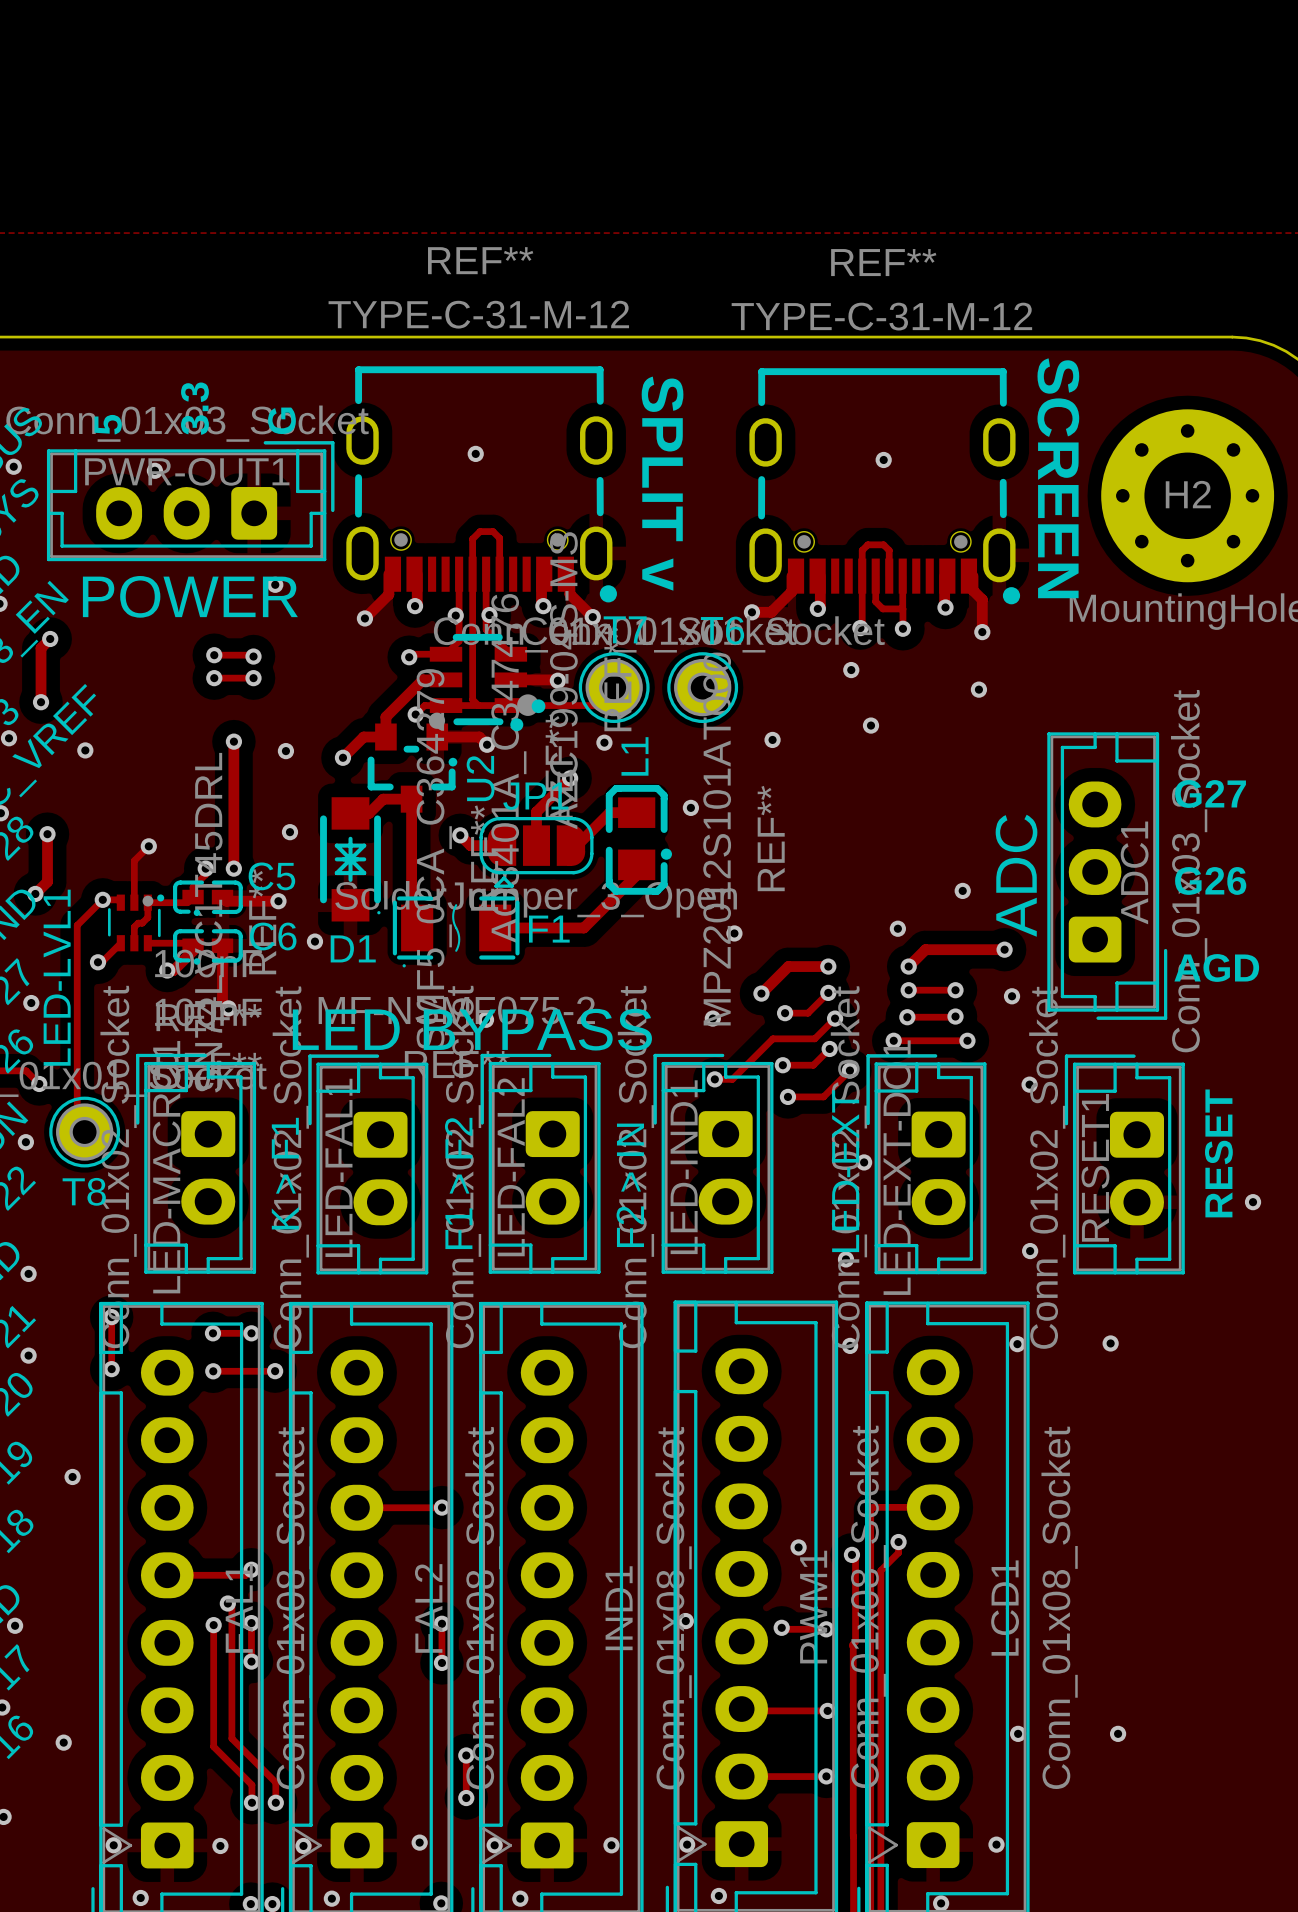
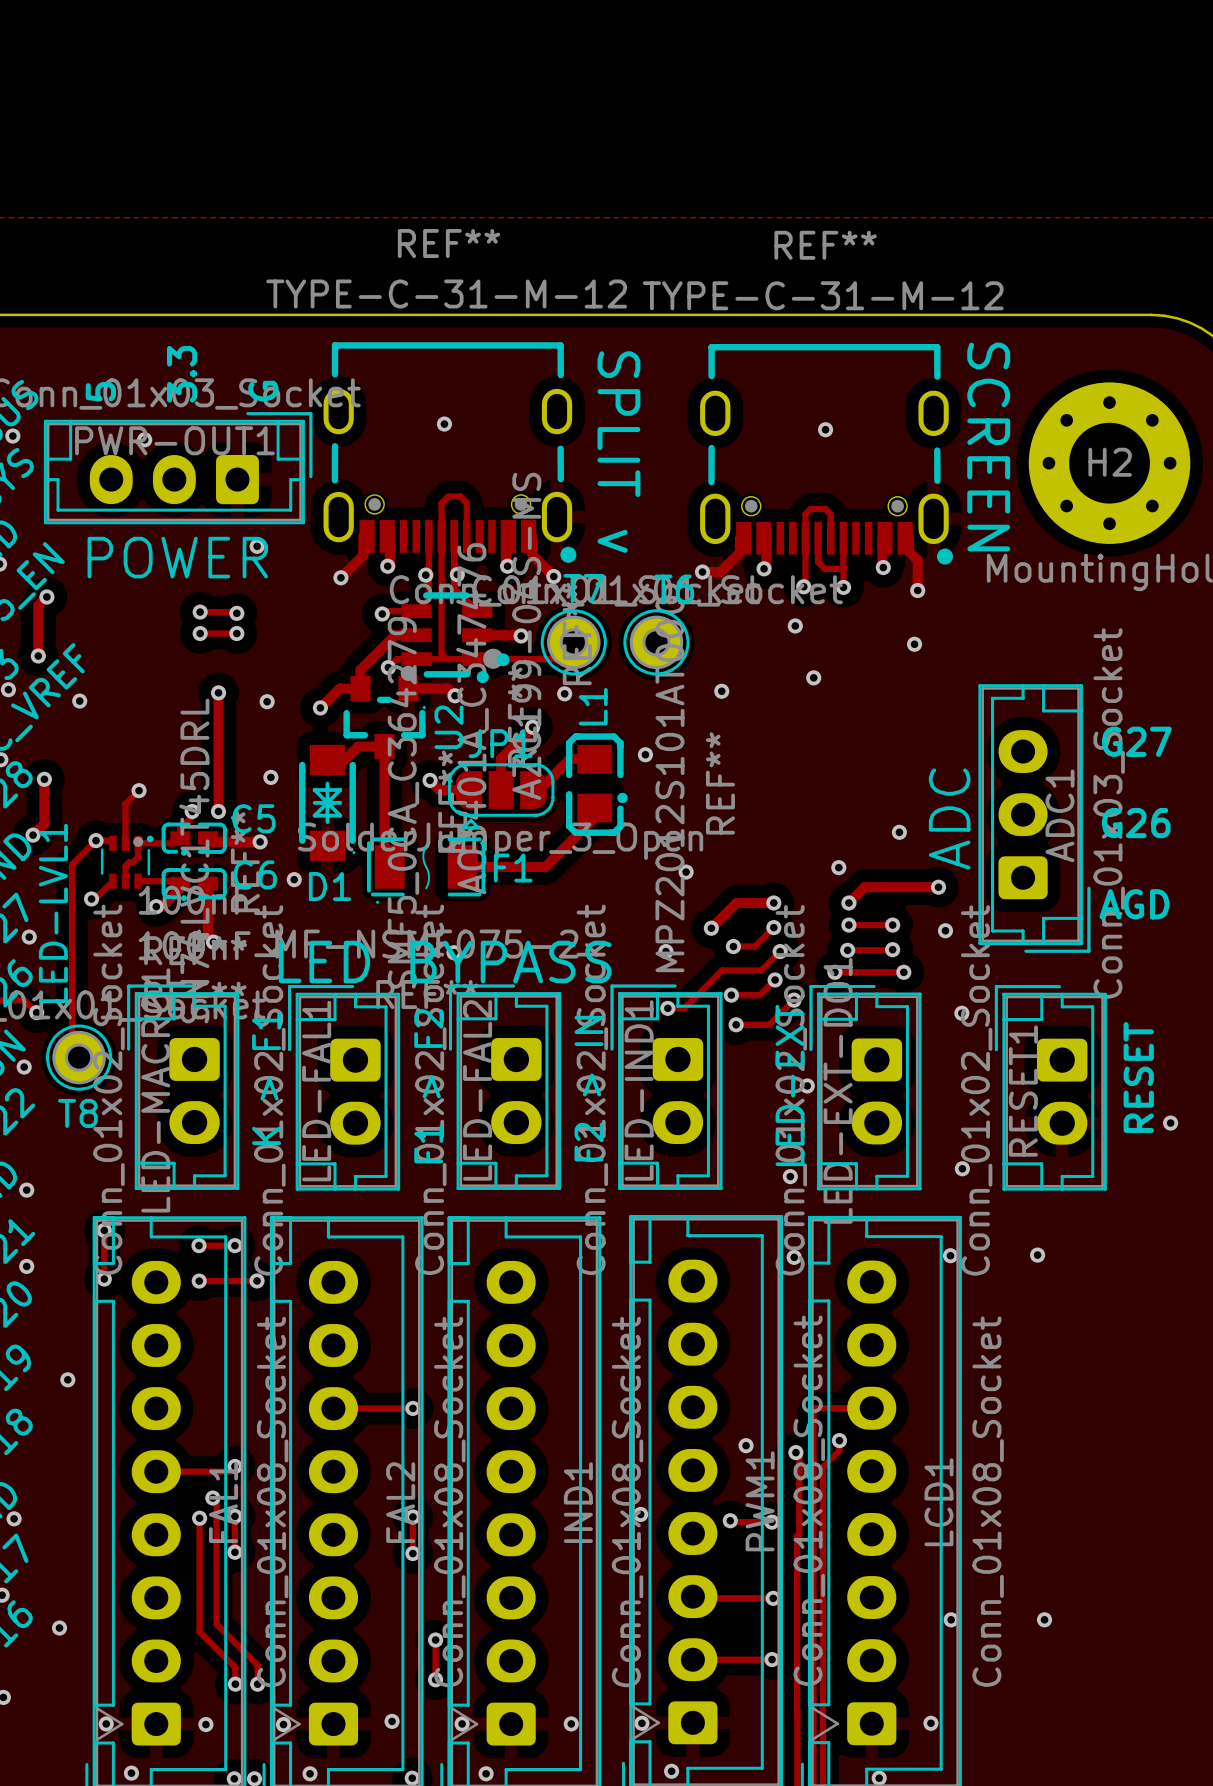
part footprint: [367, 712, 458, 813] -> [343, 665, 426, 760]

